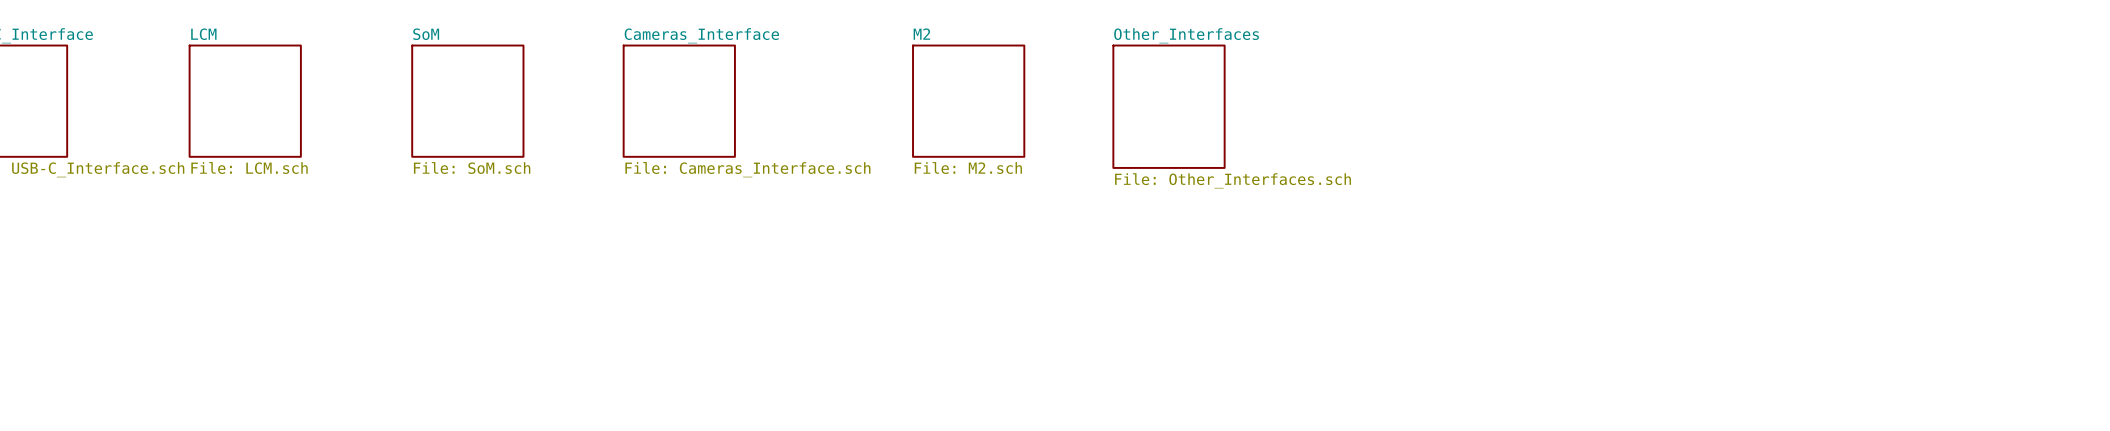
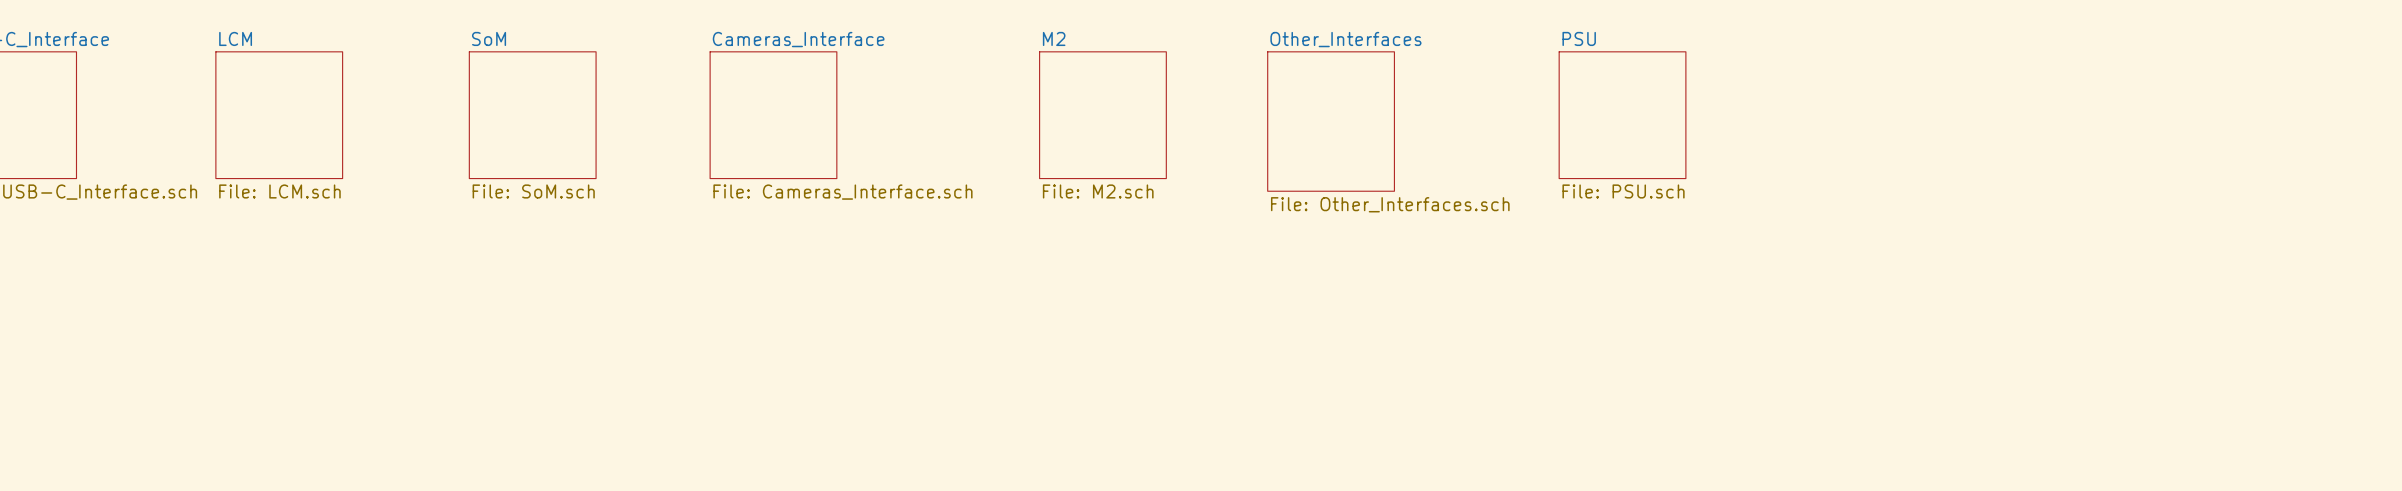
sheet PSU: none -> File: PSU.sch (1622, 115)

